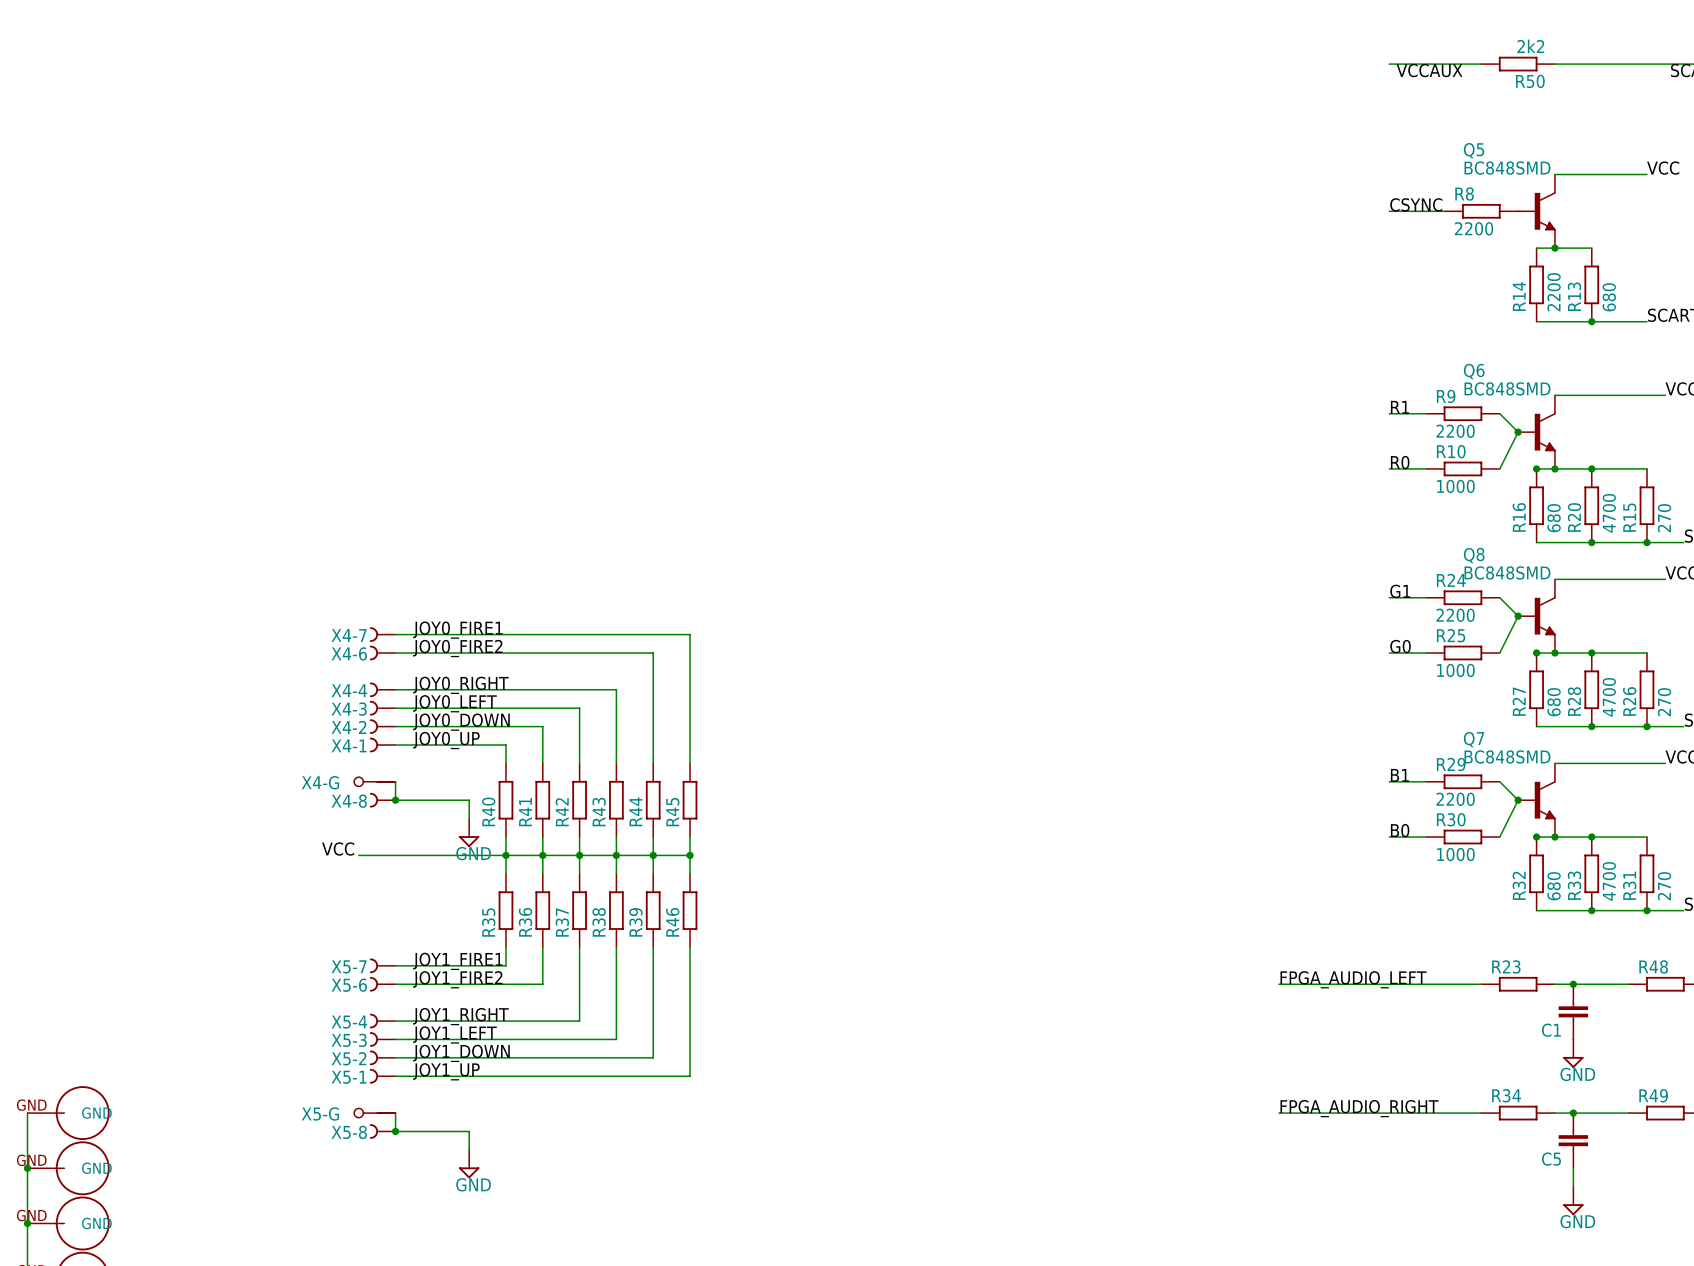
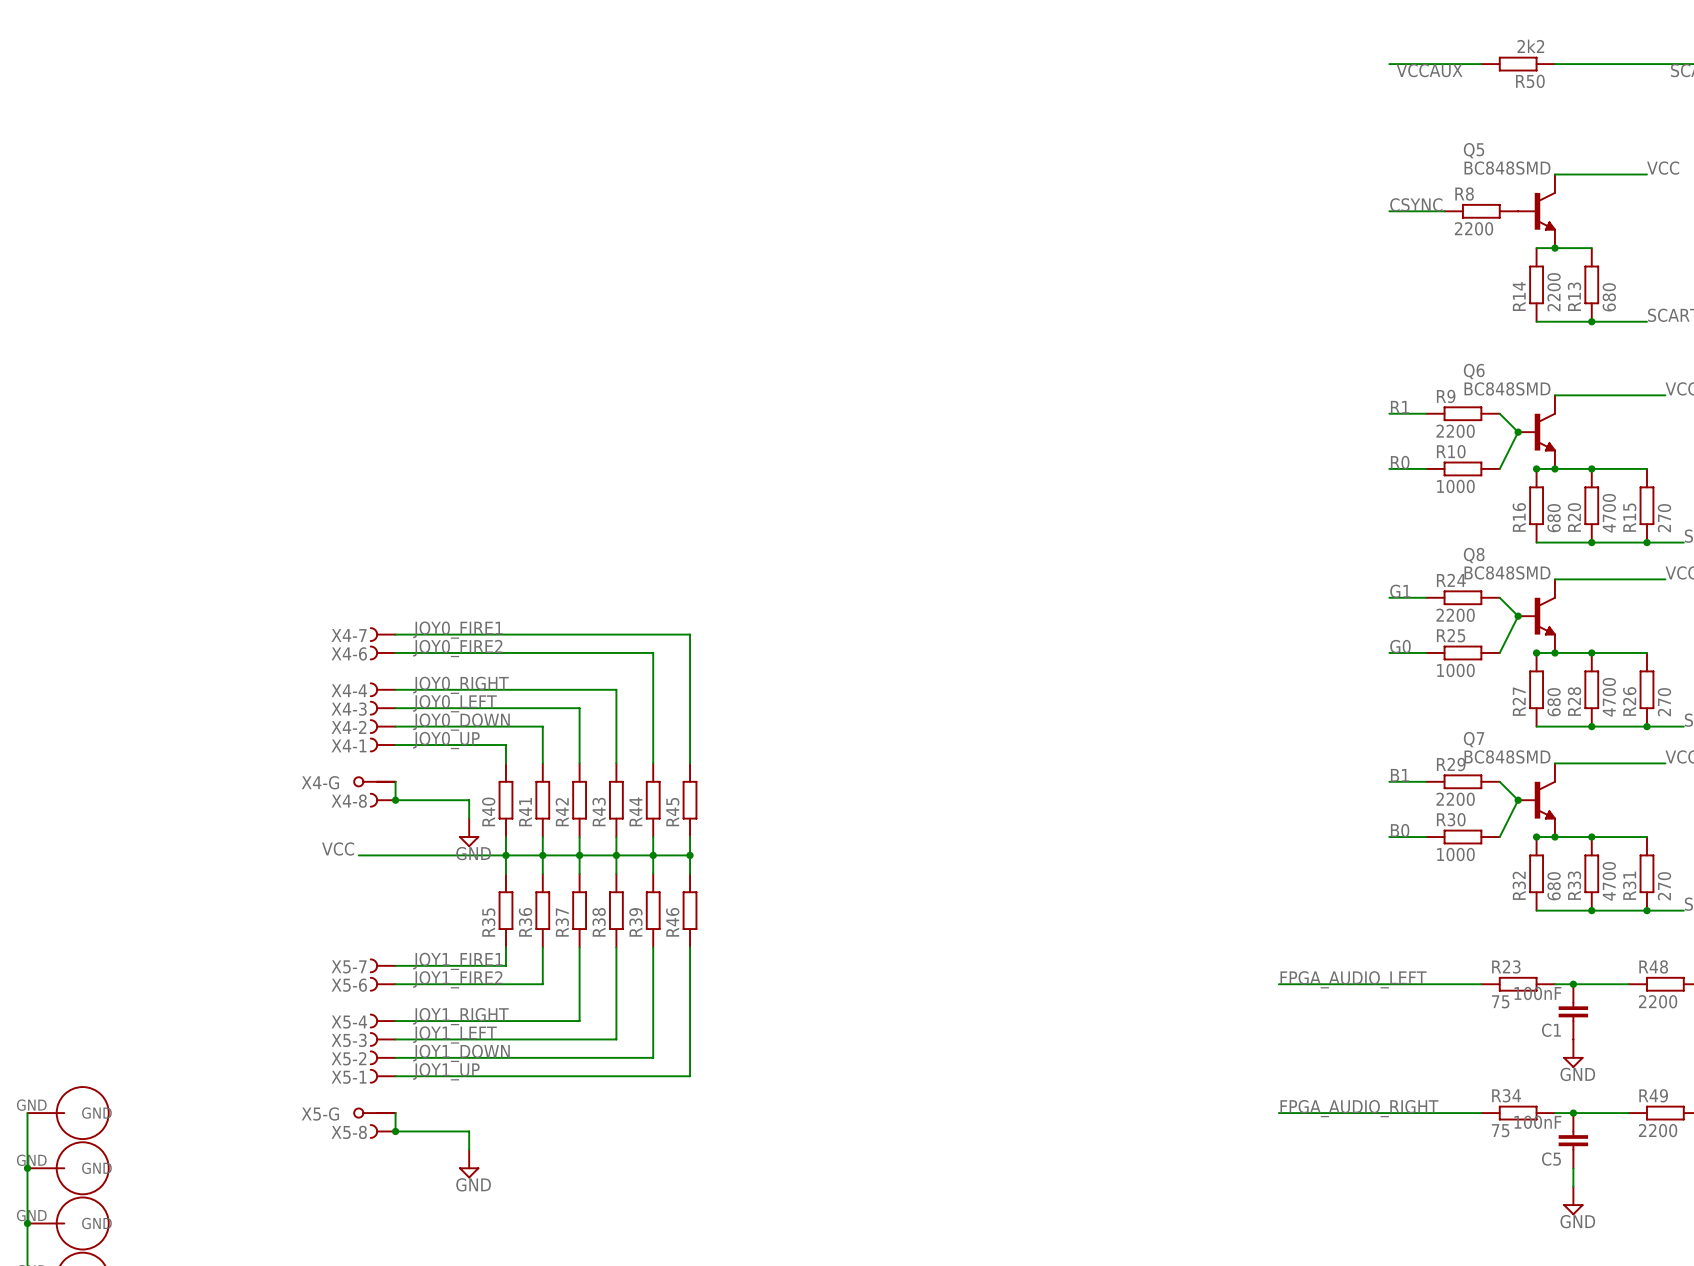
C1 value: none -> 100nF (1537, 993)
R23 value: none -> 75 (1500, 1001)
R48 value: none -> 2200 (1658, 1001)
C5 value: none -> 100nF (1537, 1122)
R34 value: none -> 75 (1500, 1130)
R49 value: none -> 2200 (1658, 1130)

